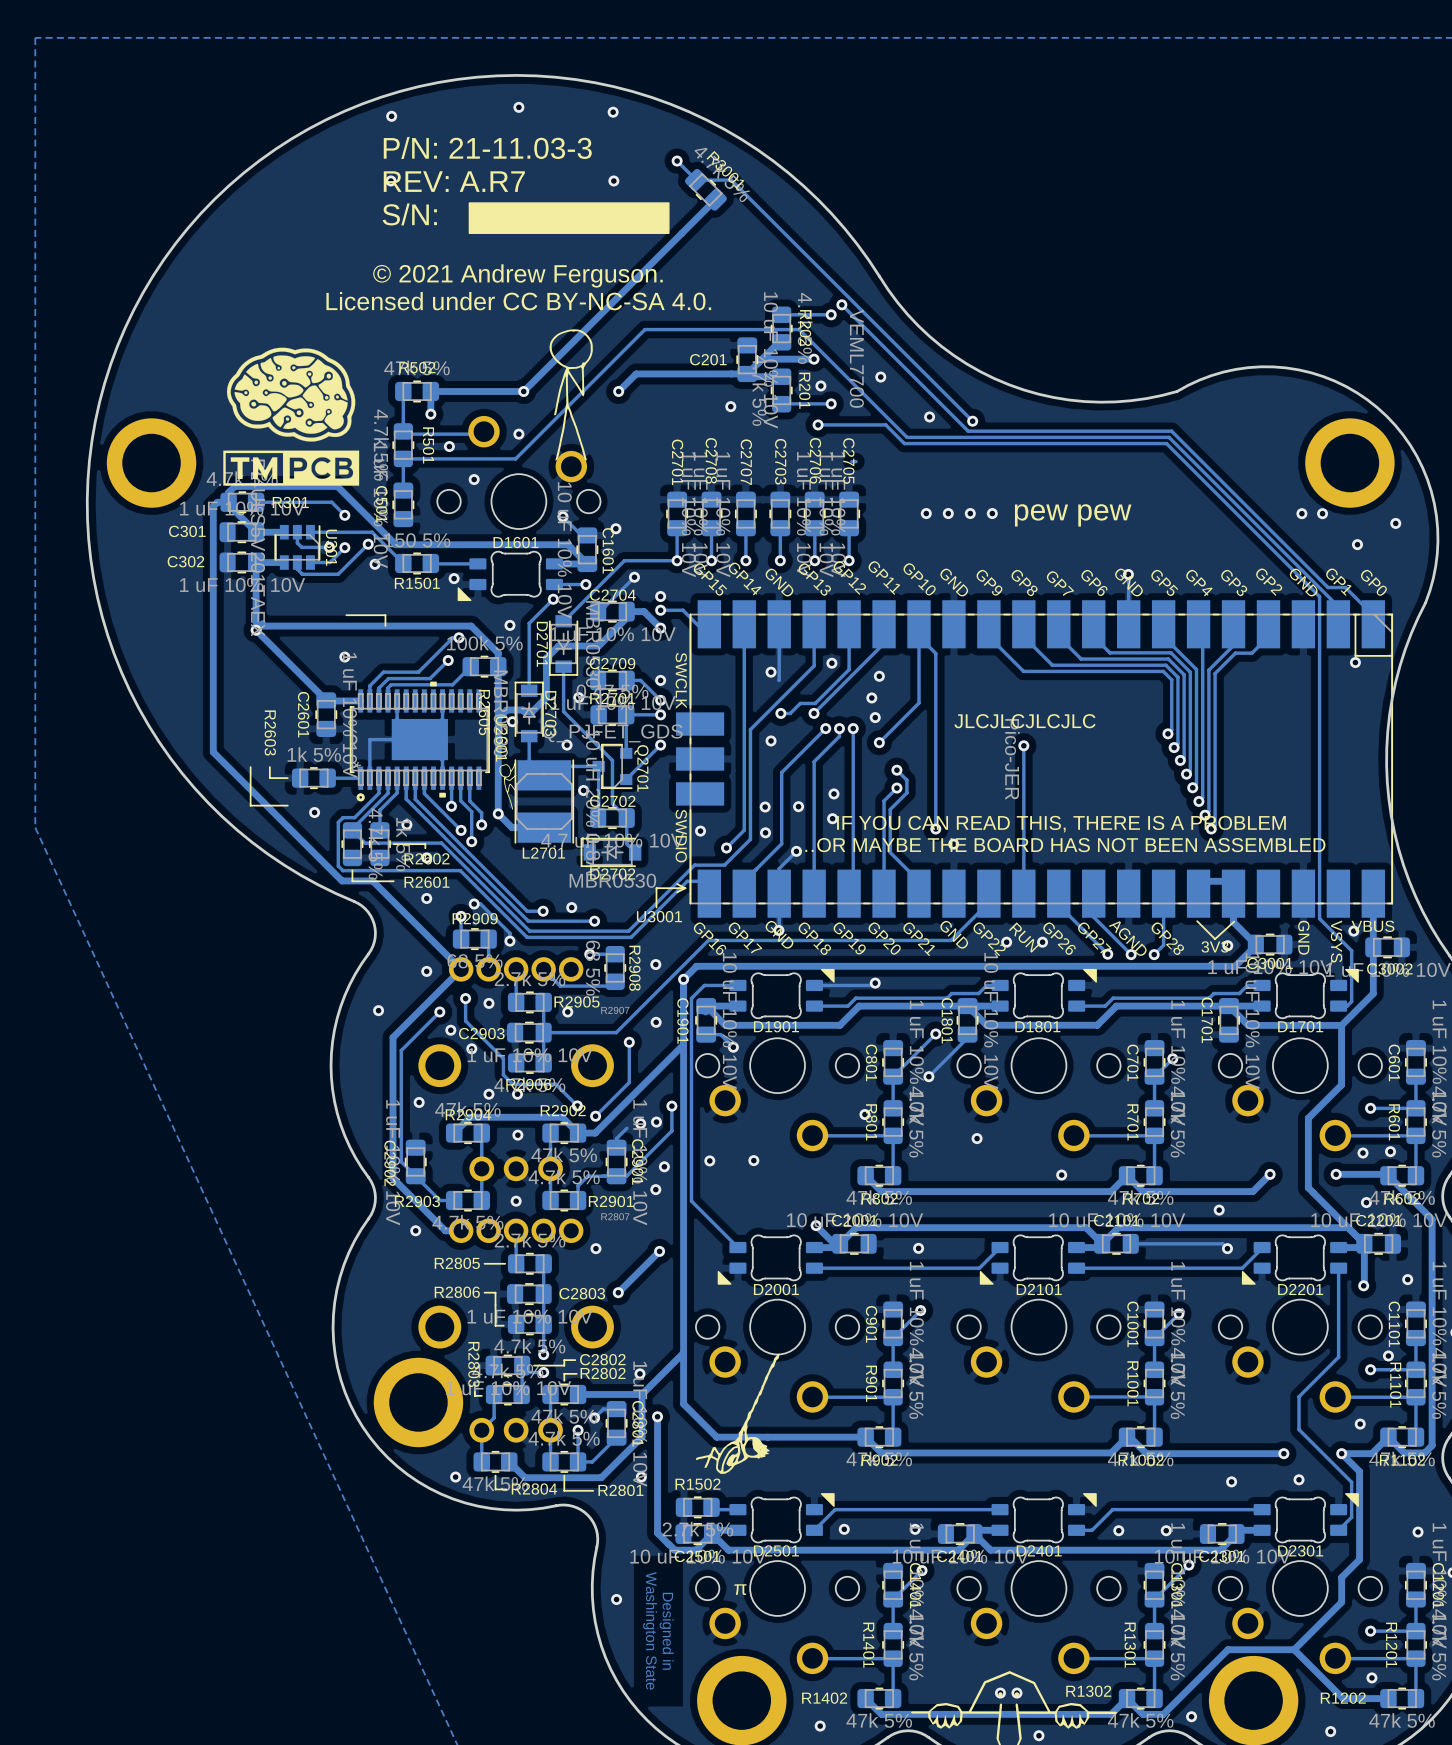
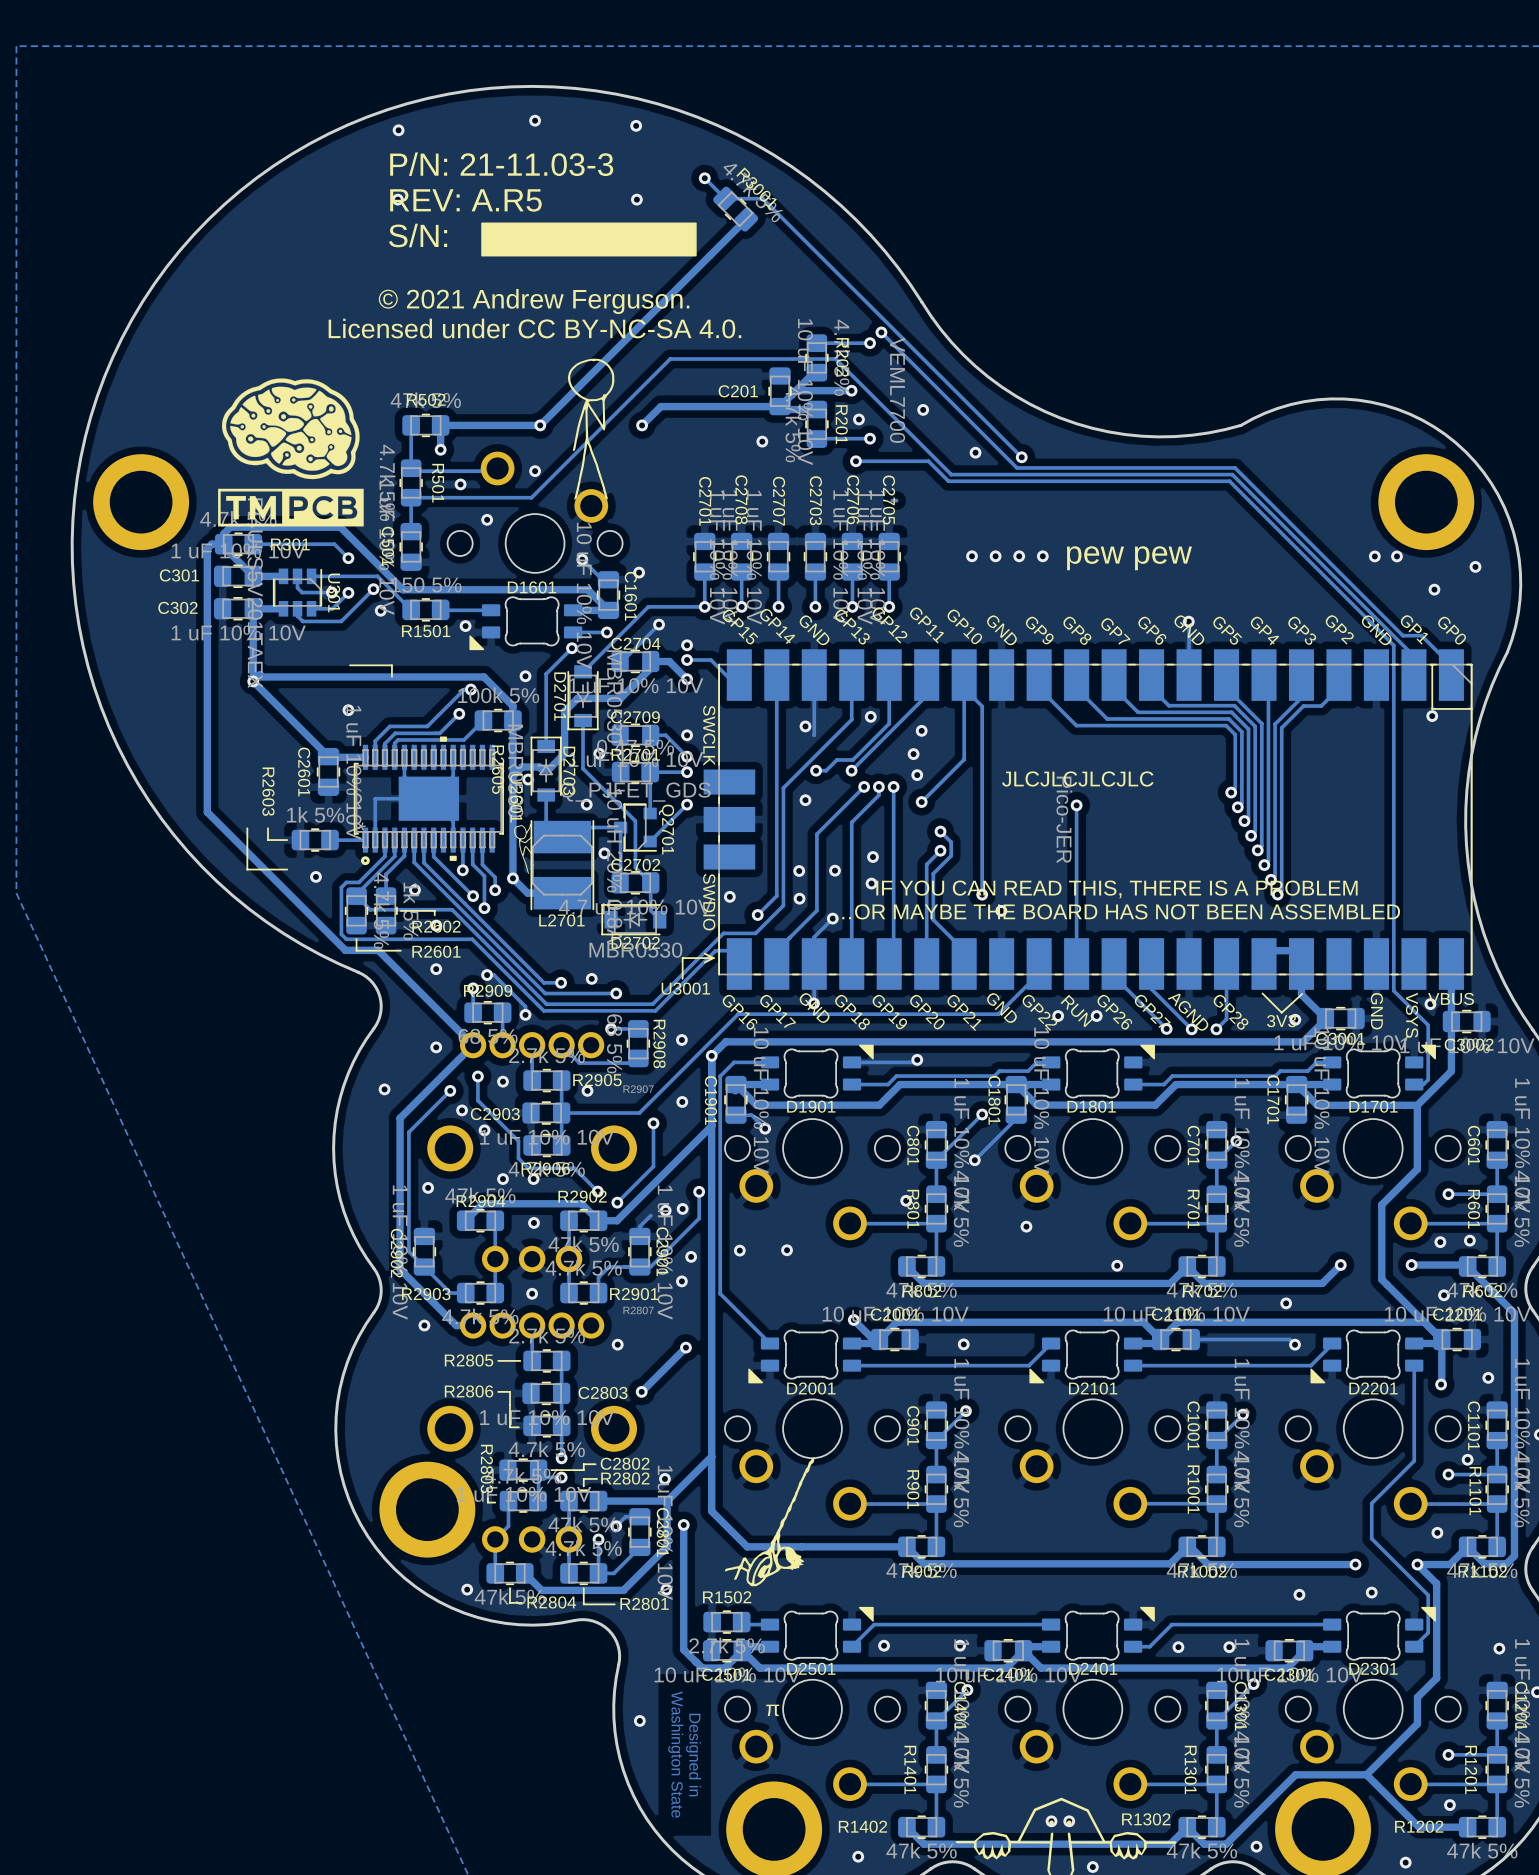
text: REV: A.R7 (454, 181) -> REV: A.R5 (465, 200)

